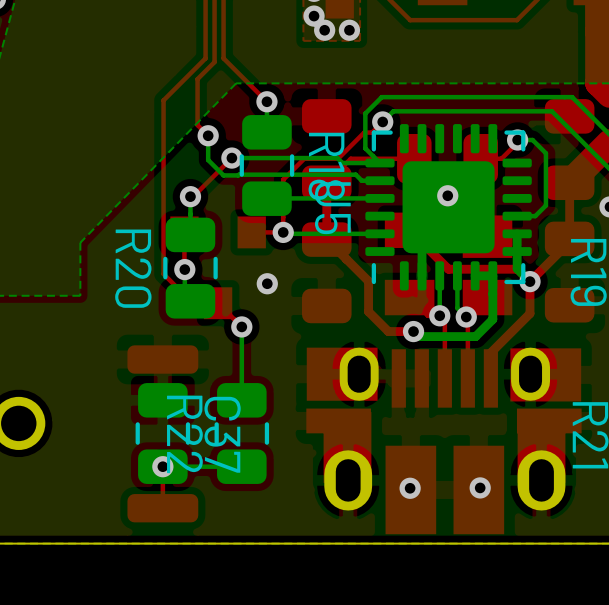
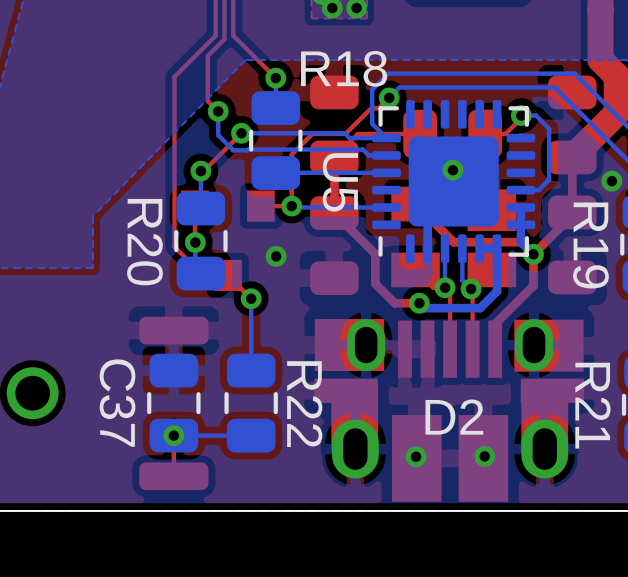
R18 name rotation: 0° (326, 166) -> 90° counterclockwise (344, 68)
R22 name position: R22 (184, 434) -> R22 (304, 404)
C37 name position: C37 (222, 434) -> C37 (117, 403)
D2 name: none -> D2 (454, 417)

